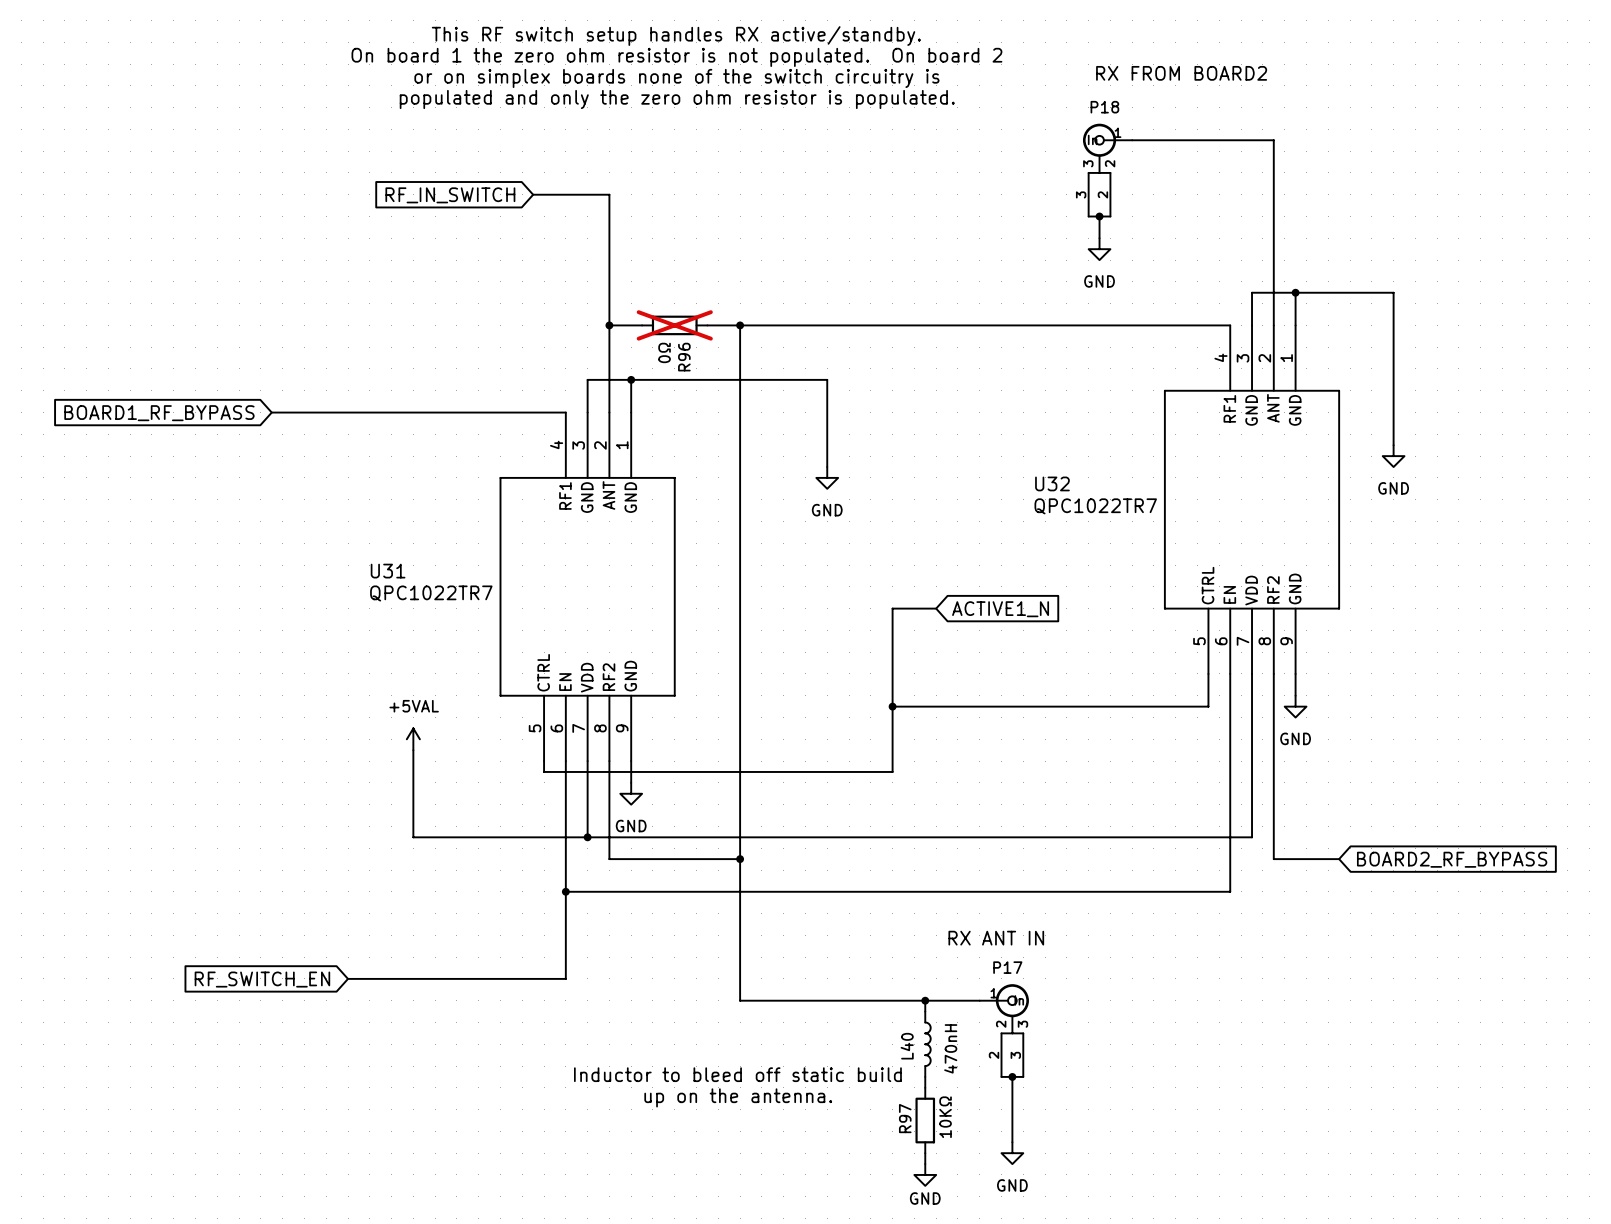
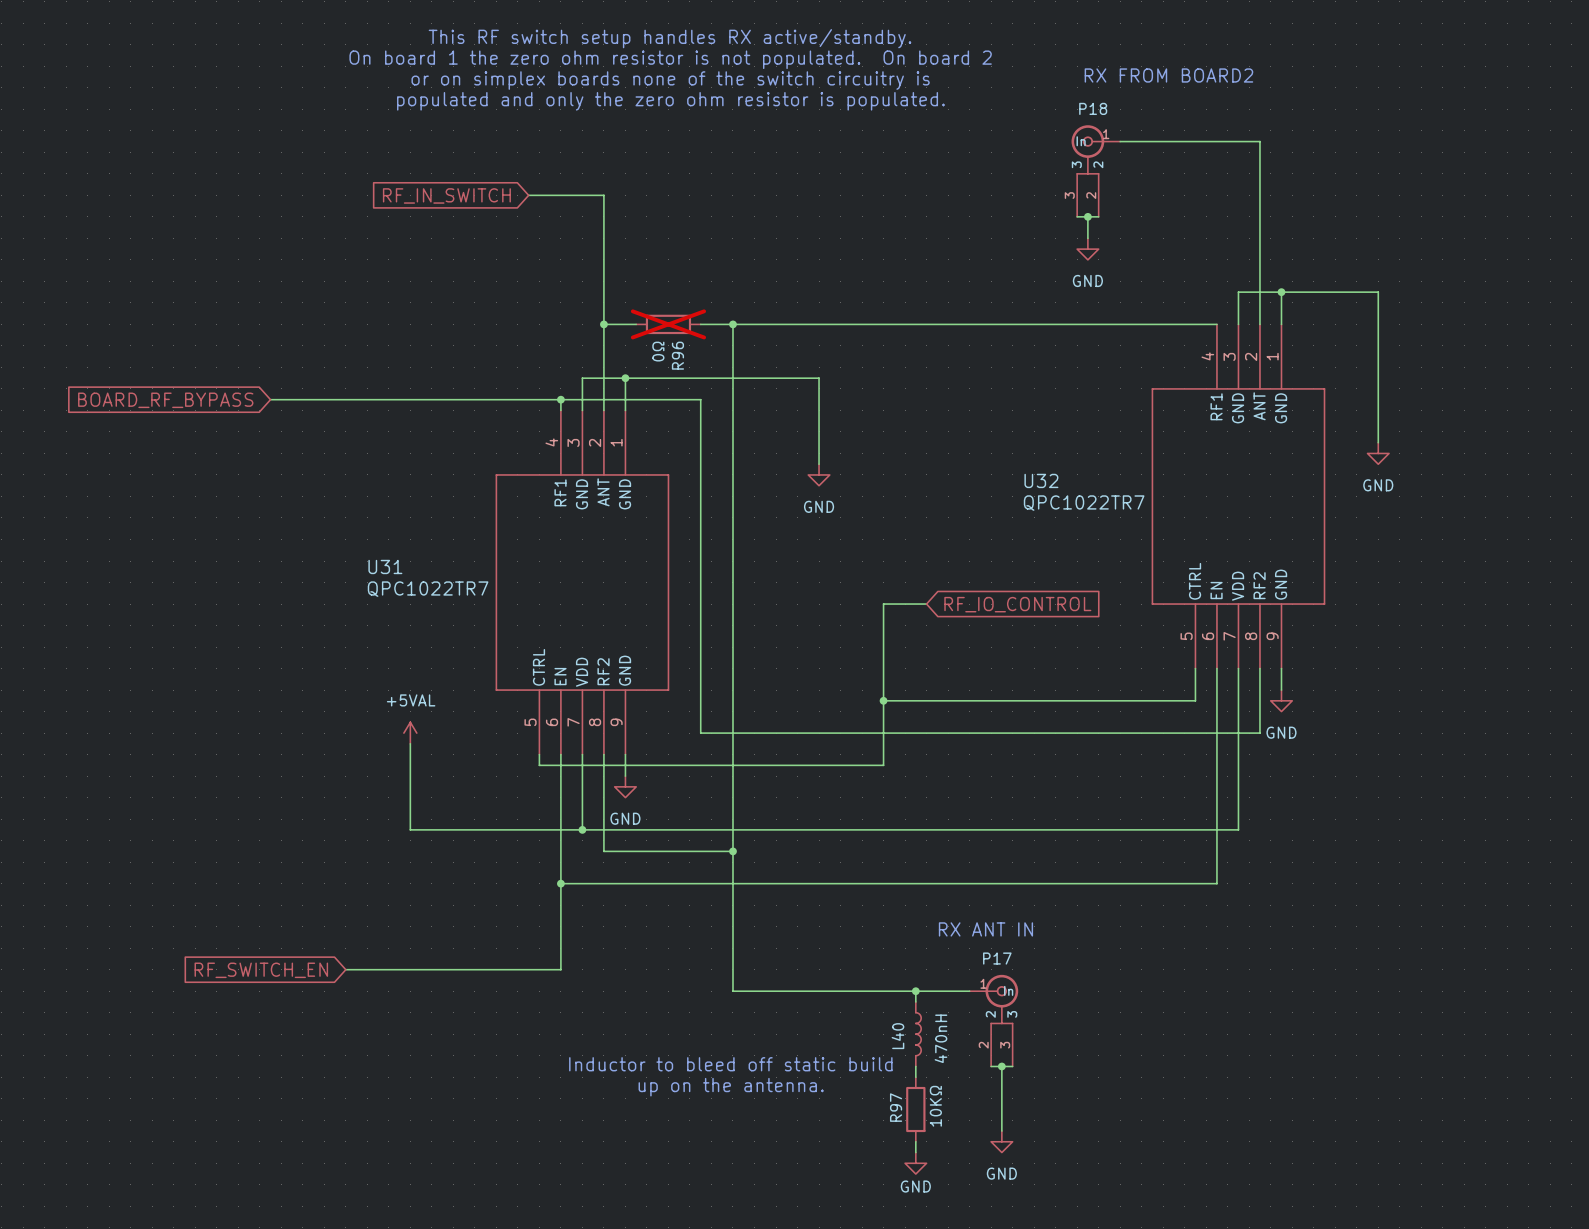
junction: none -> (560, 399)
wire: (271, 412) (565, 412) -> (560, 399) (560, 410)
global label: BOARD1_RF_BYPASS (159, 413) -> BOARD_RF_BYPASS (165, 400)
global label: ACTIVE1_N (1000, 609) -> RF_IO_CONTROL (1017, 604)
wire: (1273, 739) (1273, 859) (1339, 859) -> (1259, 733) (700, 733) (700, 399) (270, 399)
global label: BOARD2_RF_BYPASS (1452, 859) -> none

